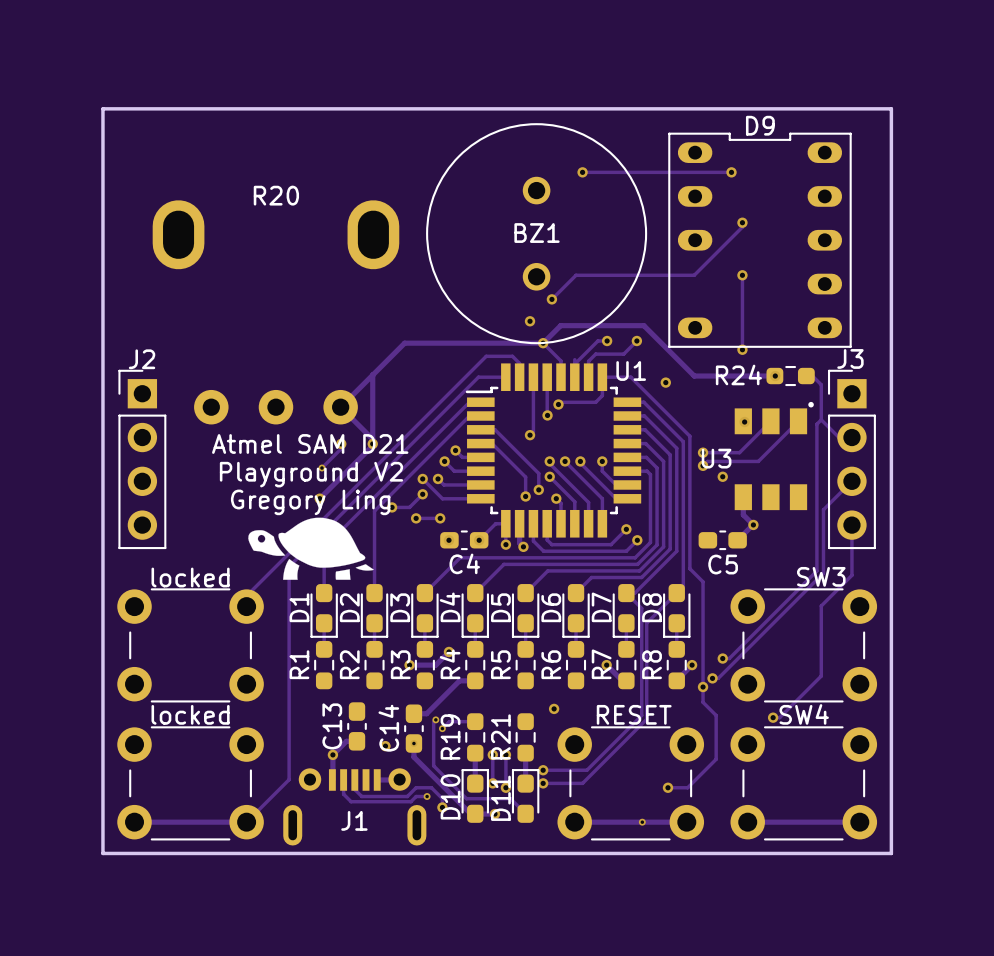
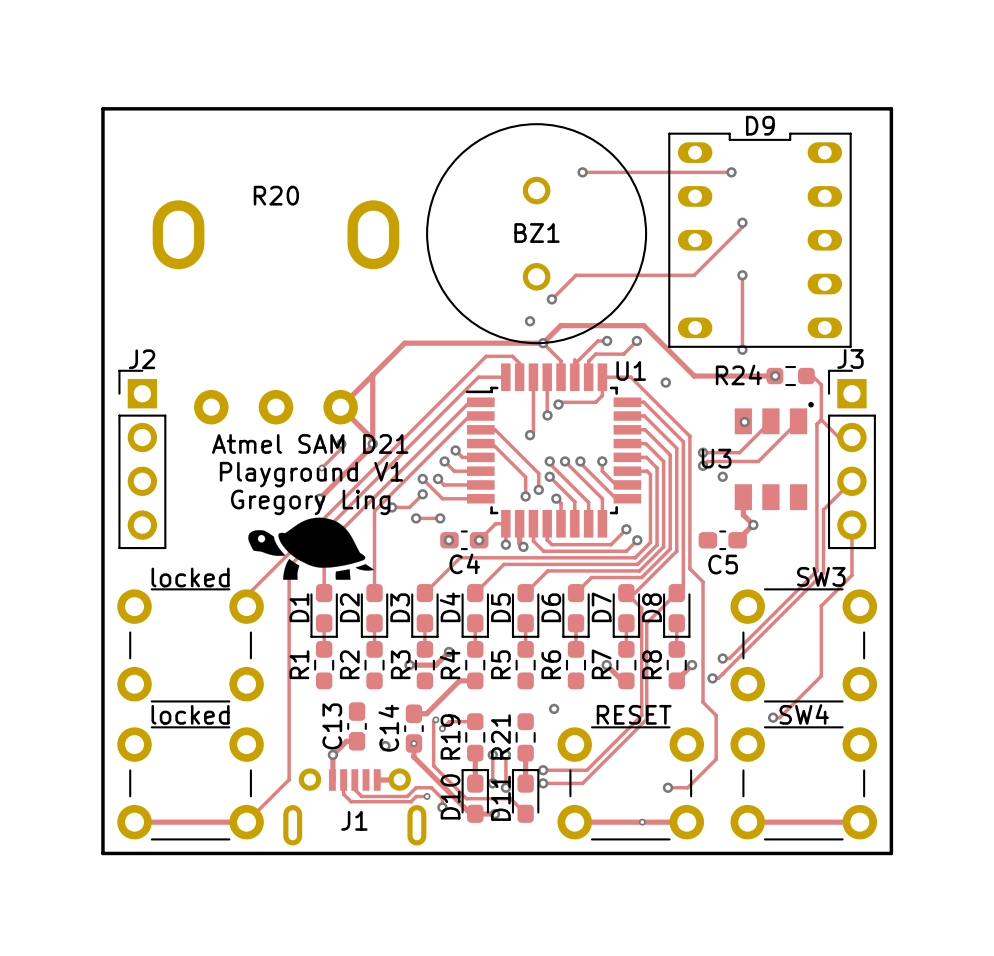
text: Playground V2 (311, 474) -> Playground V1 (311, 474)
via: (703, 687) -> none

